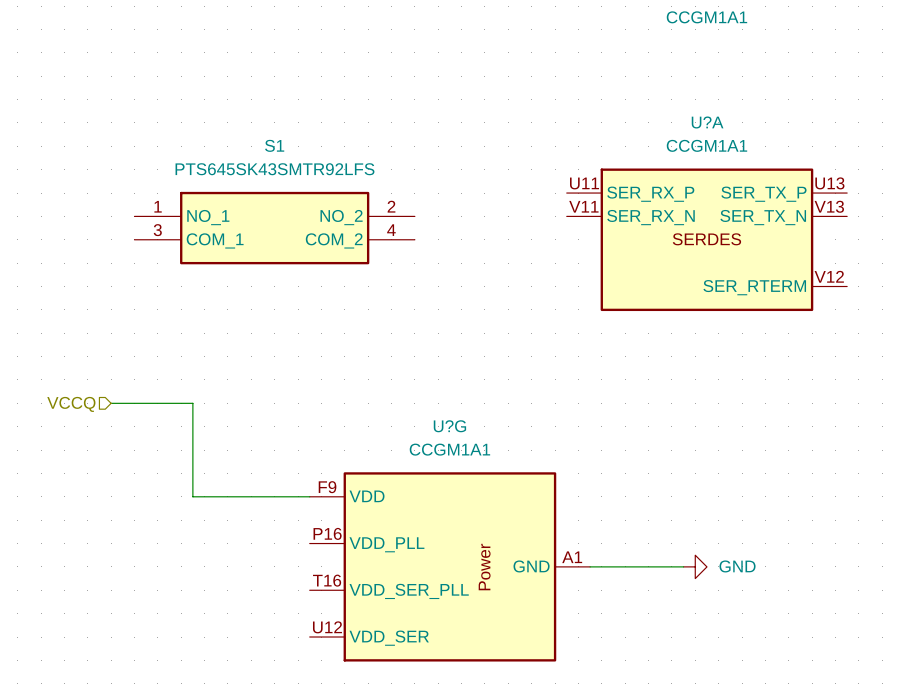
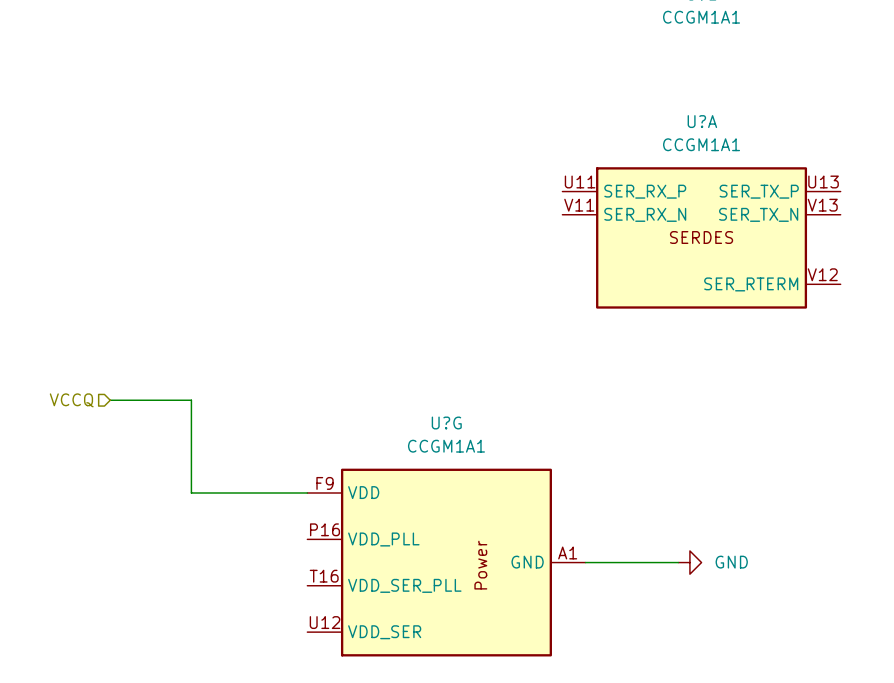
S1: PTS645SK43SMTR92LFS (274, 228) -> none

